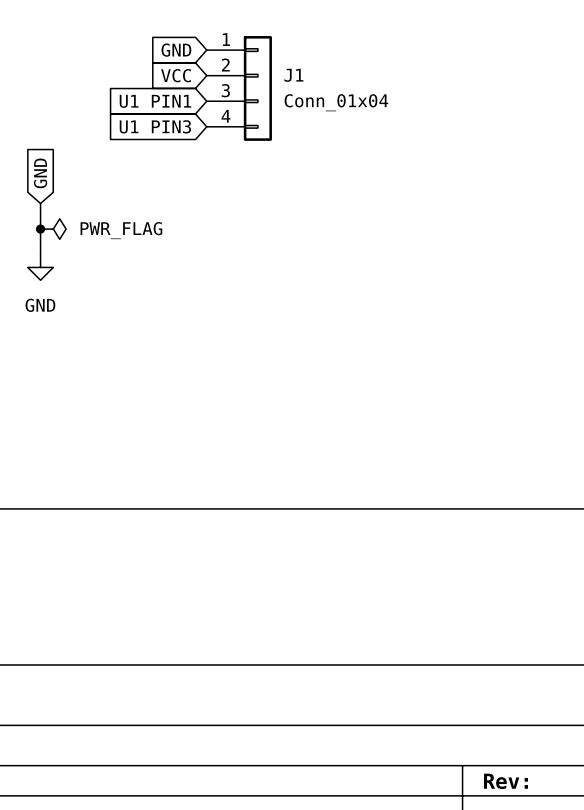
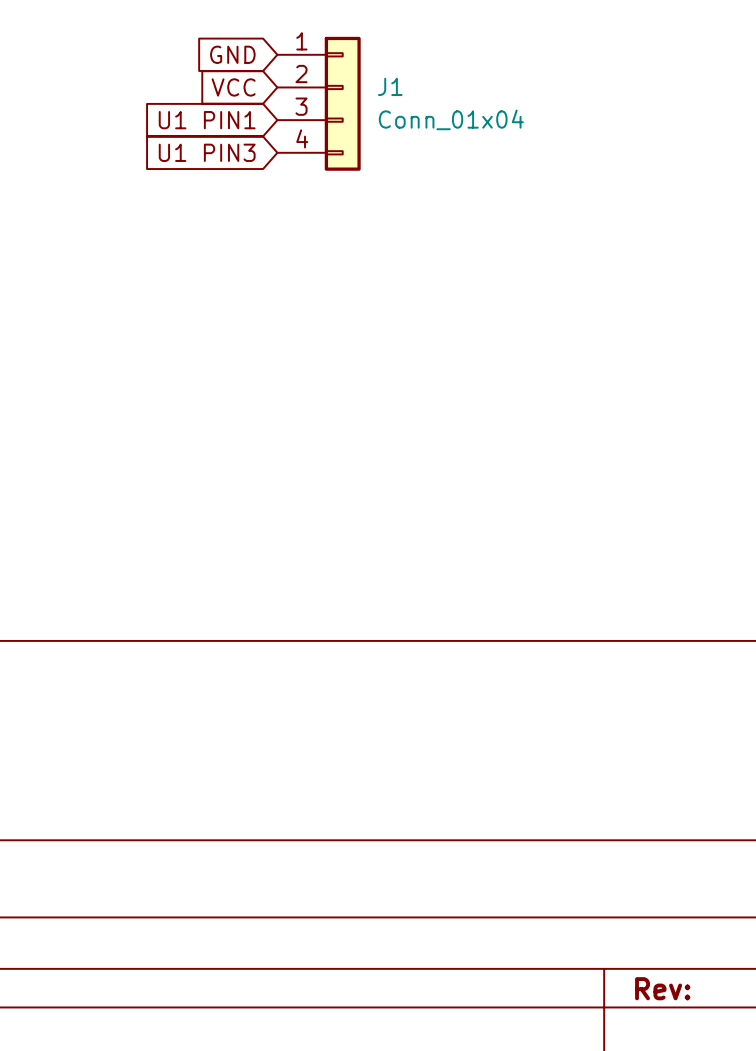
global label: GND (40, 173) -> none
wire: (40, 203) (40, 254) -> none
junction: (40, 229) -> none
power symbol: PWR_FLAG (53, 229) -> none
power symbol: GND (40, 267) -> none

